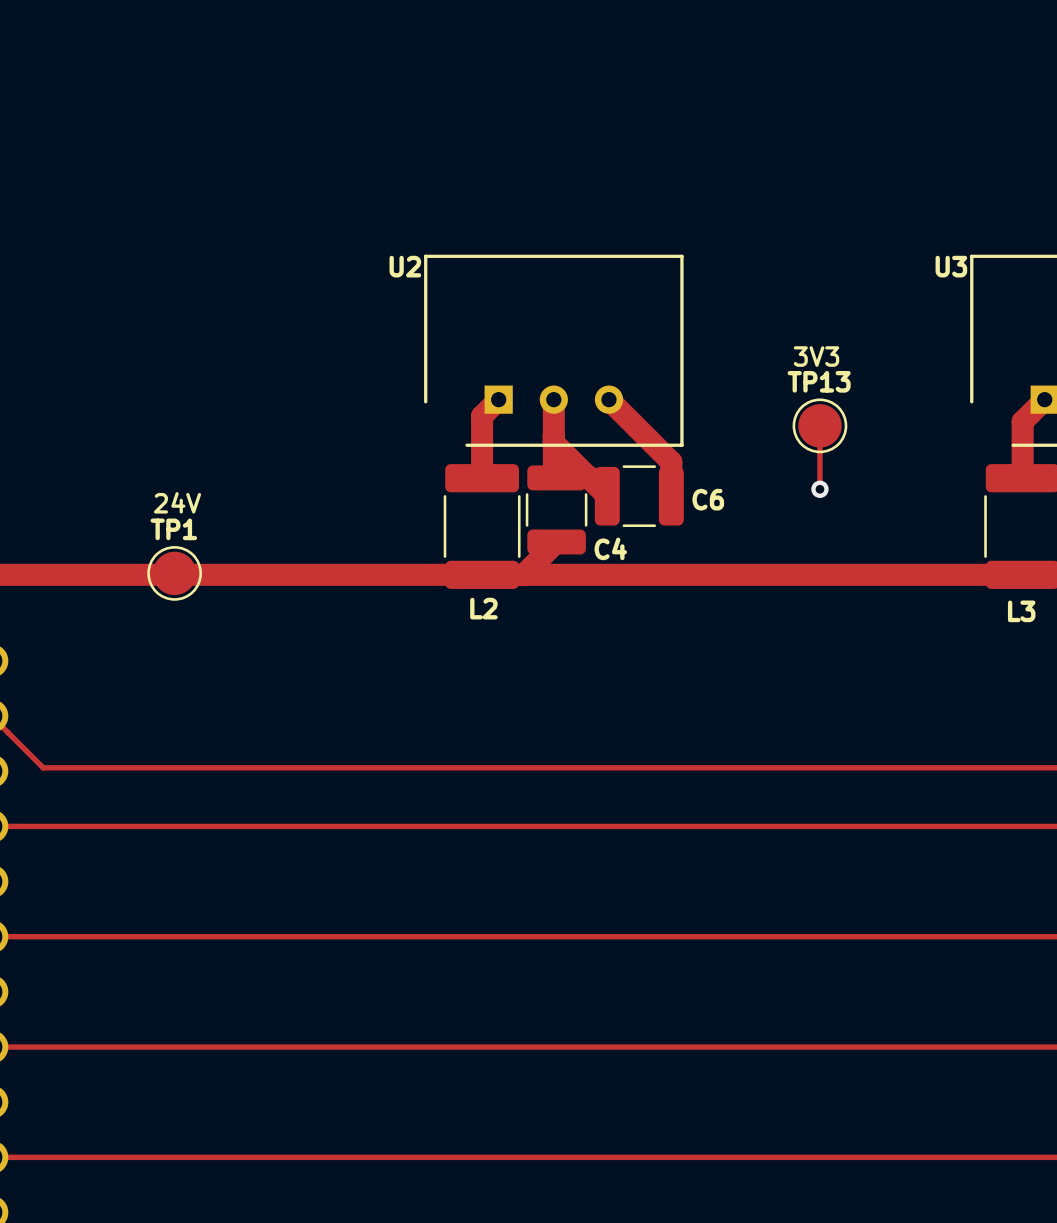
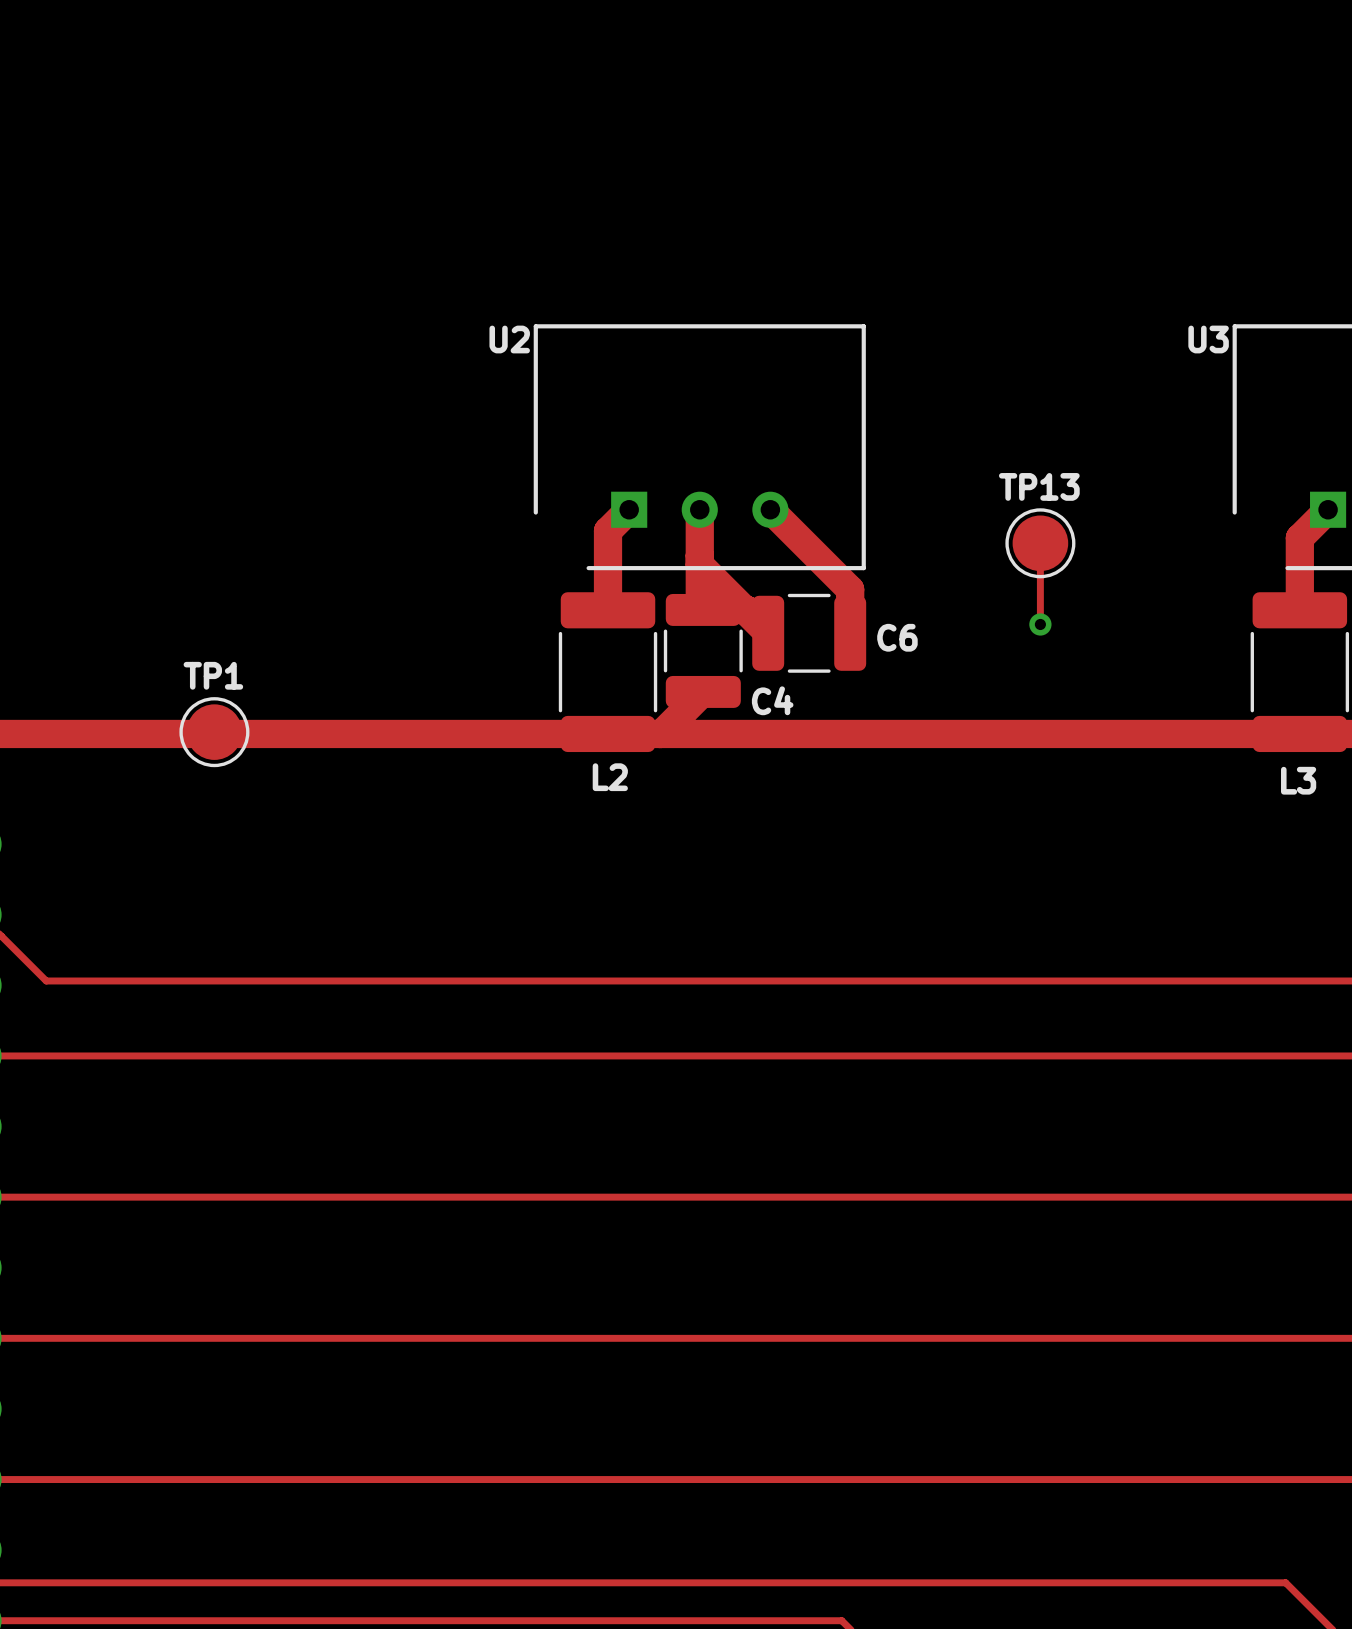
text: 3V3 (816, 356) -> none
text: 24V (177, 502) -> none

